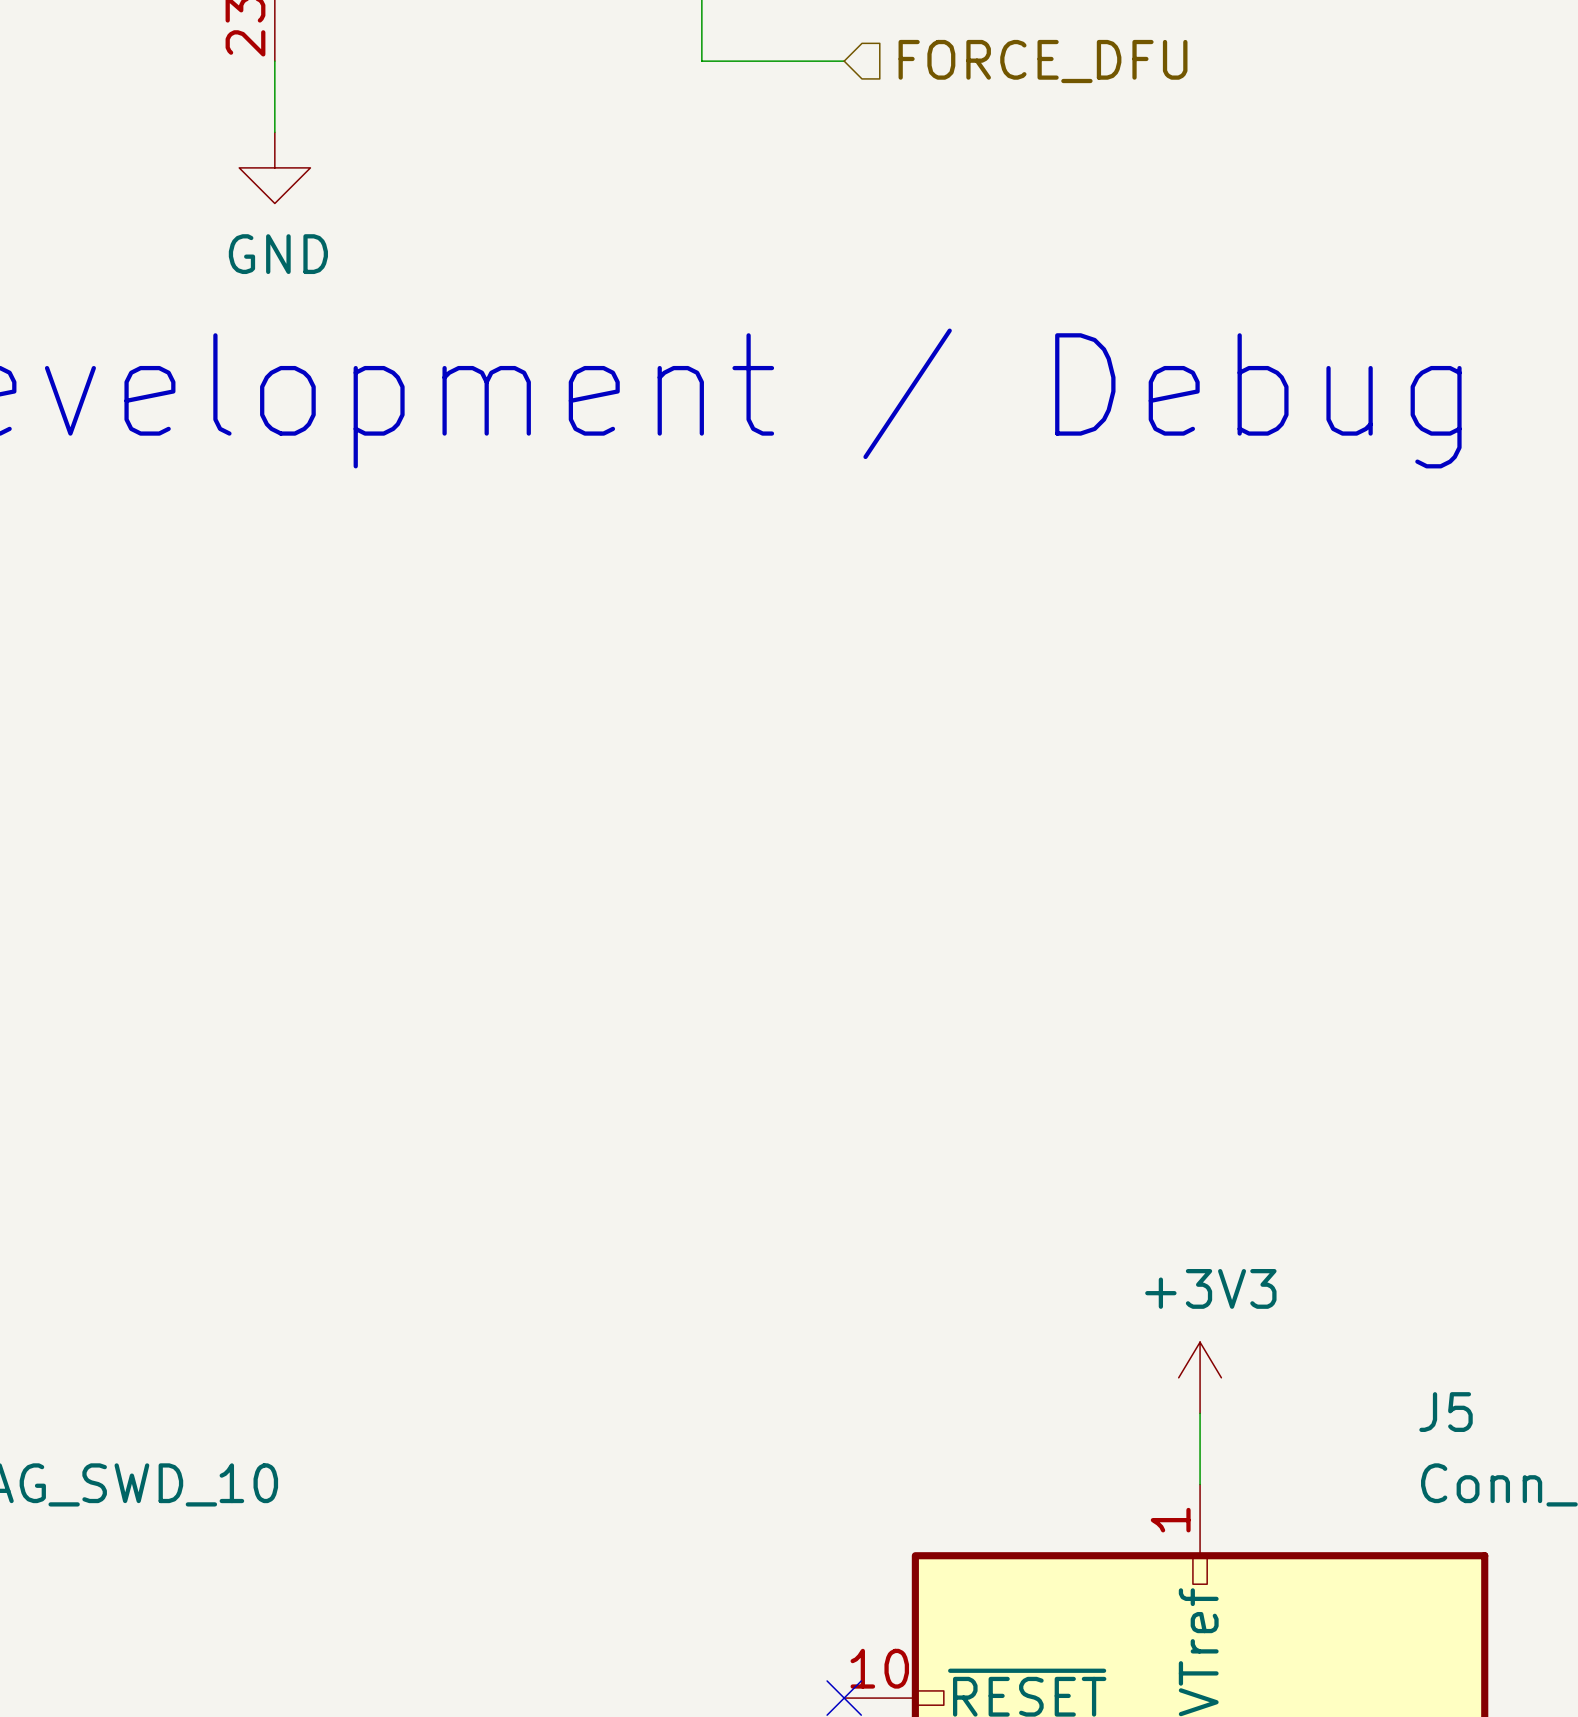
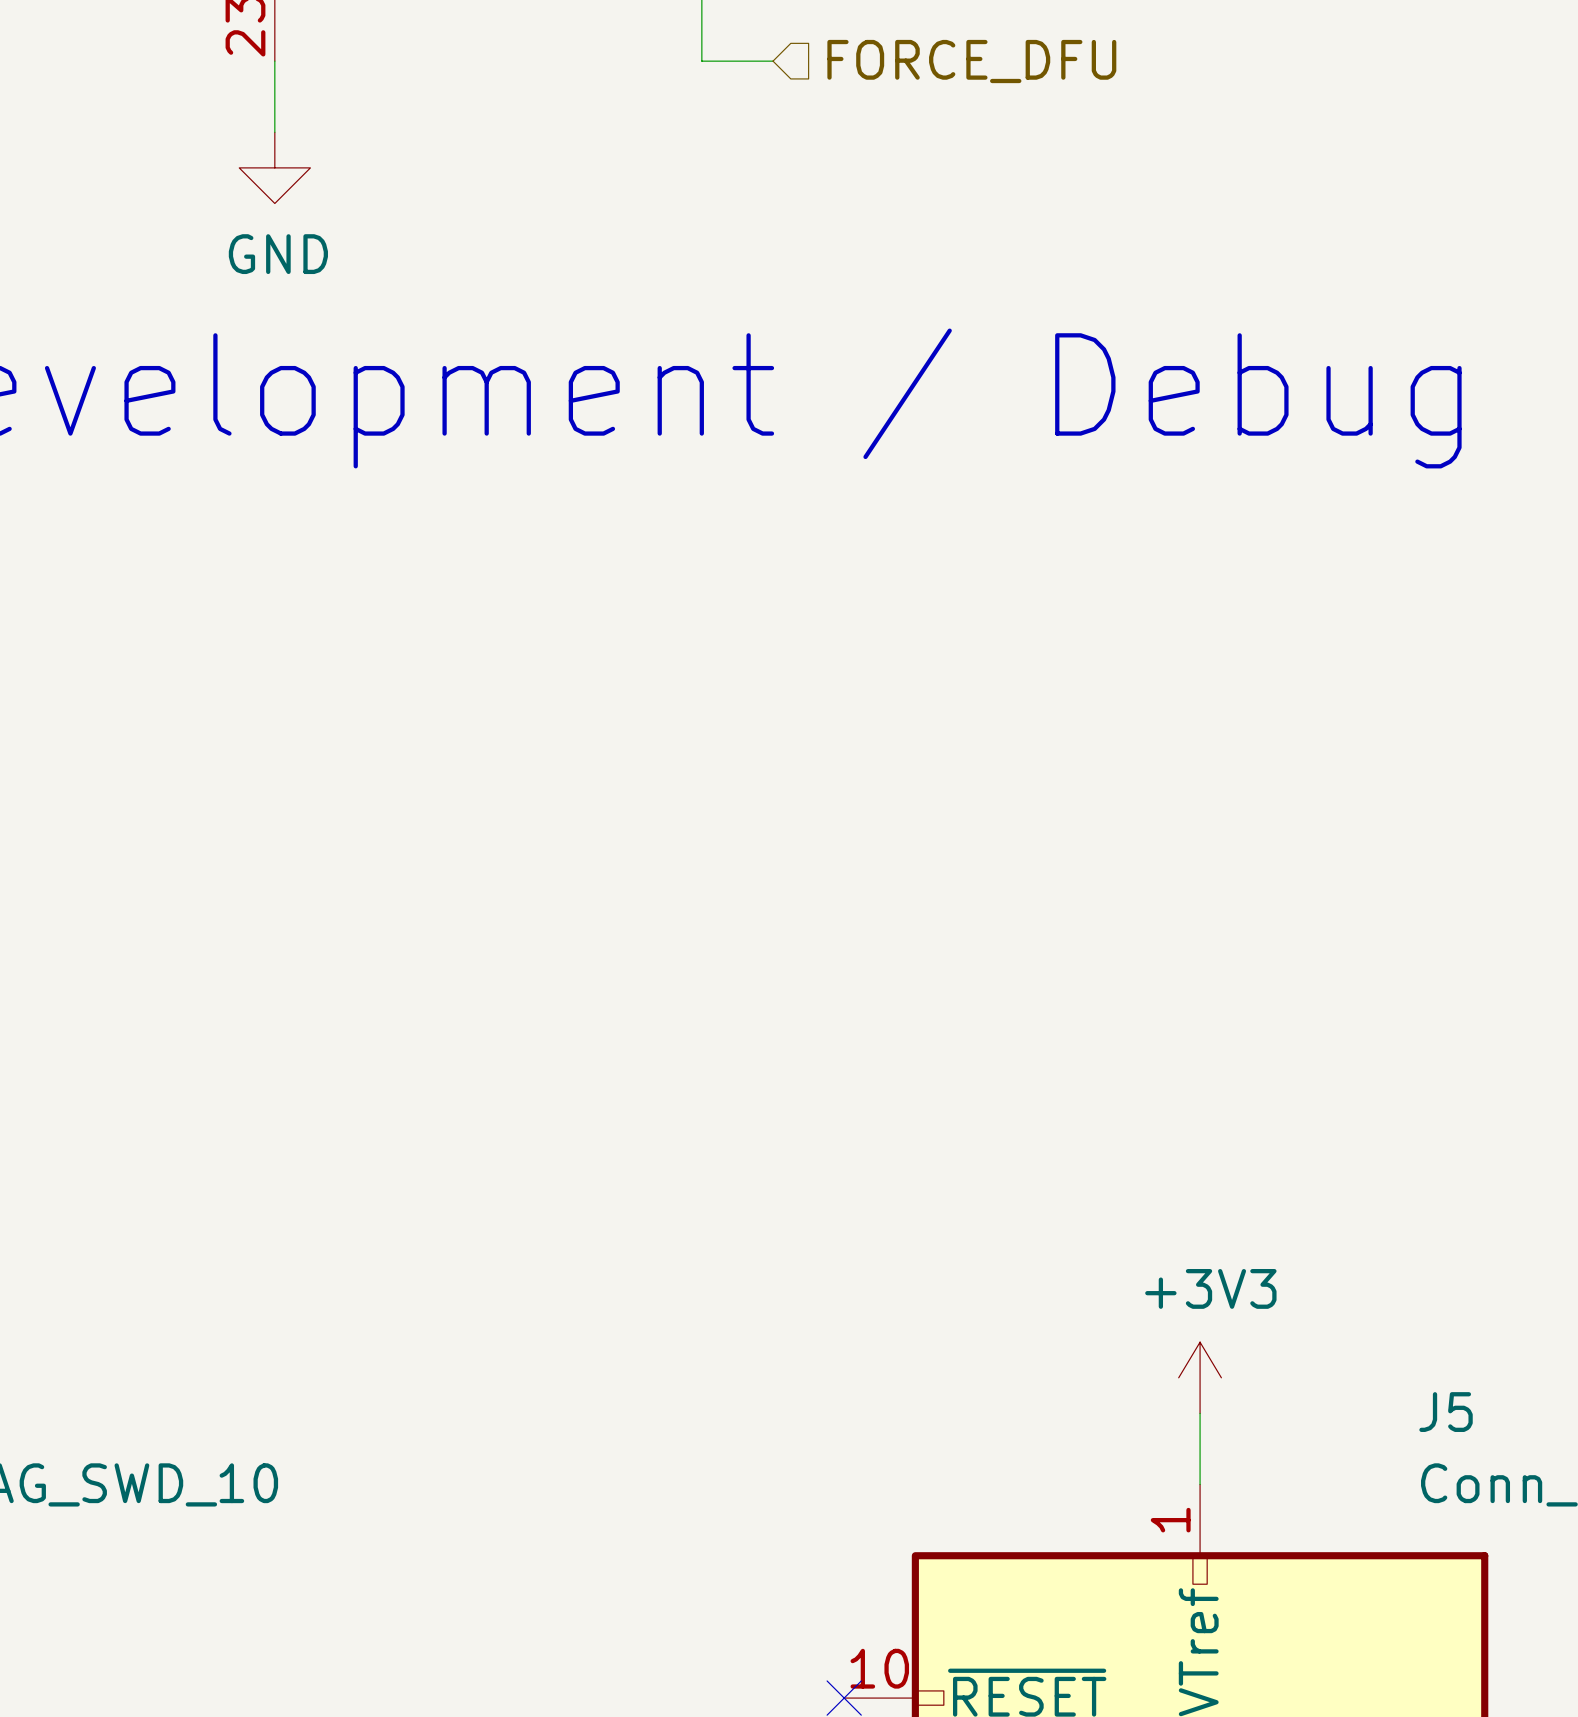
wire: (773, 61) (844, 61) -> none
hierarchical label position: FORCE_DFU (1043, 61) -> FORCE_DFU (971, 61)

